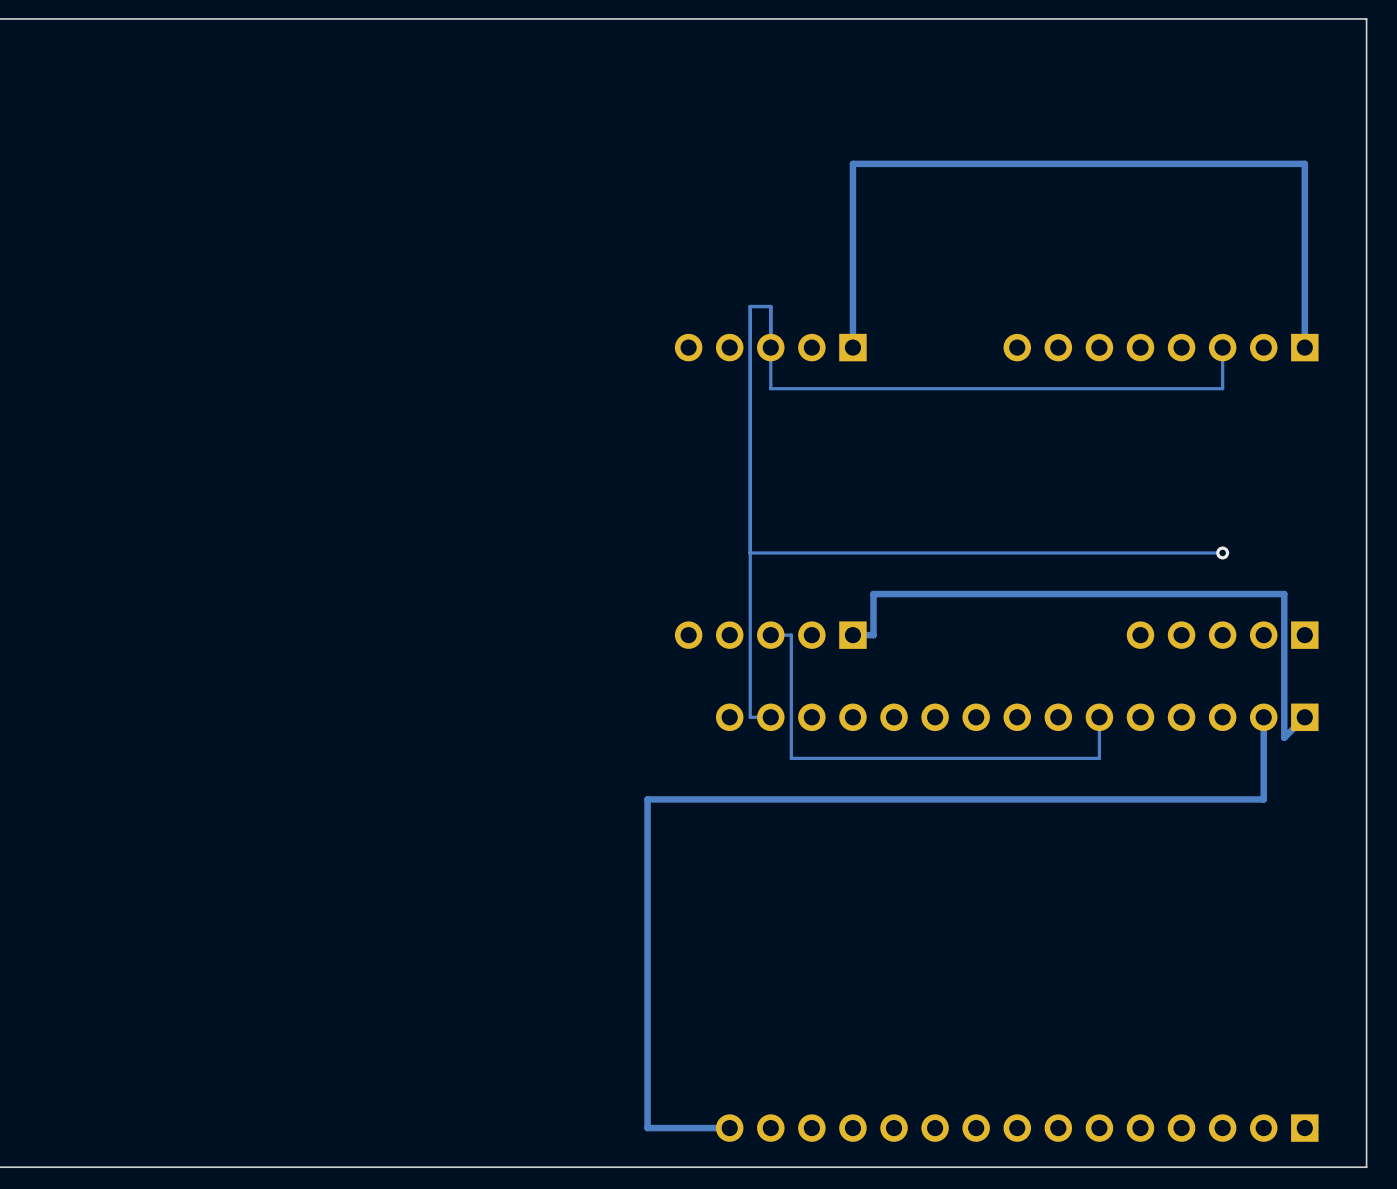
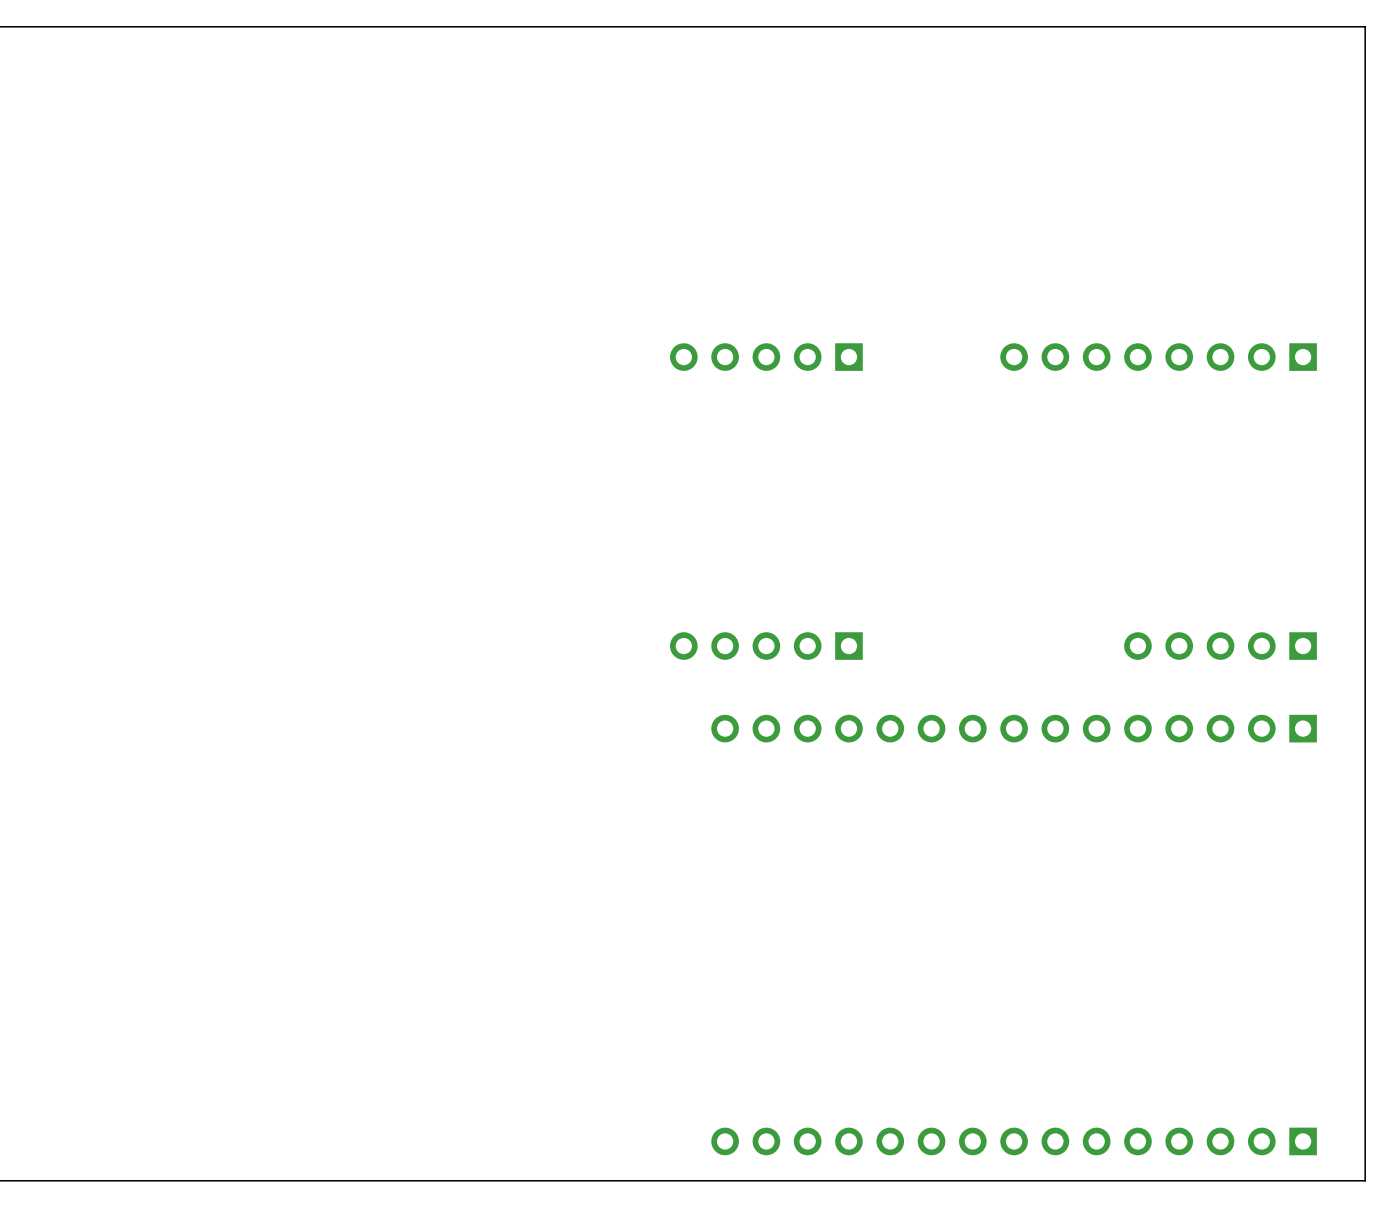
track: (1222, 347) (1222, 388) (770, 388) (770, 306) (750, 306) (750, 717) (770, 717) -> none
track: (1304, 347) (1304, 163) (852, 163) (852, 347) -> none
track: (1222, 552) (750, 552) -> none
via: (1222, 552) -> none
track: (770, 635) (791, 635) (791, 758) (1099, 758) (1099, 717) -> none
track: (852, 635) (873, 635) (873, 594) (1284, 594) (1284, 737) (1304, 717) -> none
track: (1263, 717) (1263, 799) (647, 799) (647, 1128) (729, 1128) -> none

